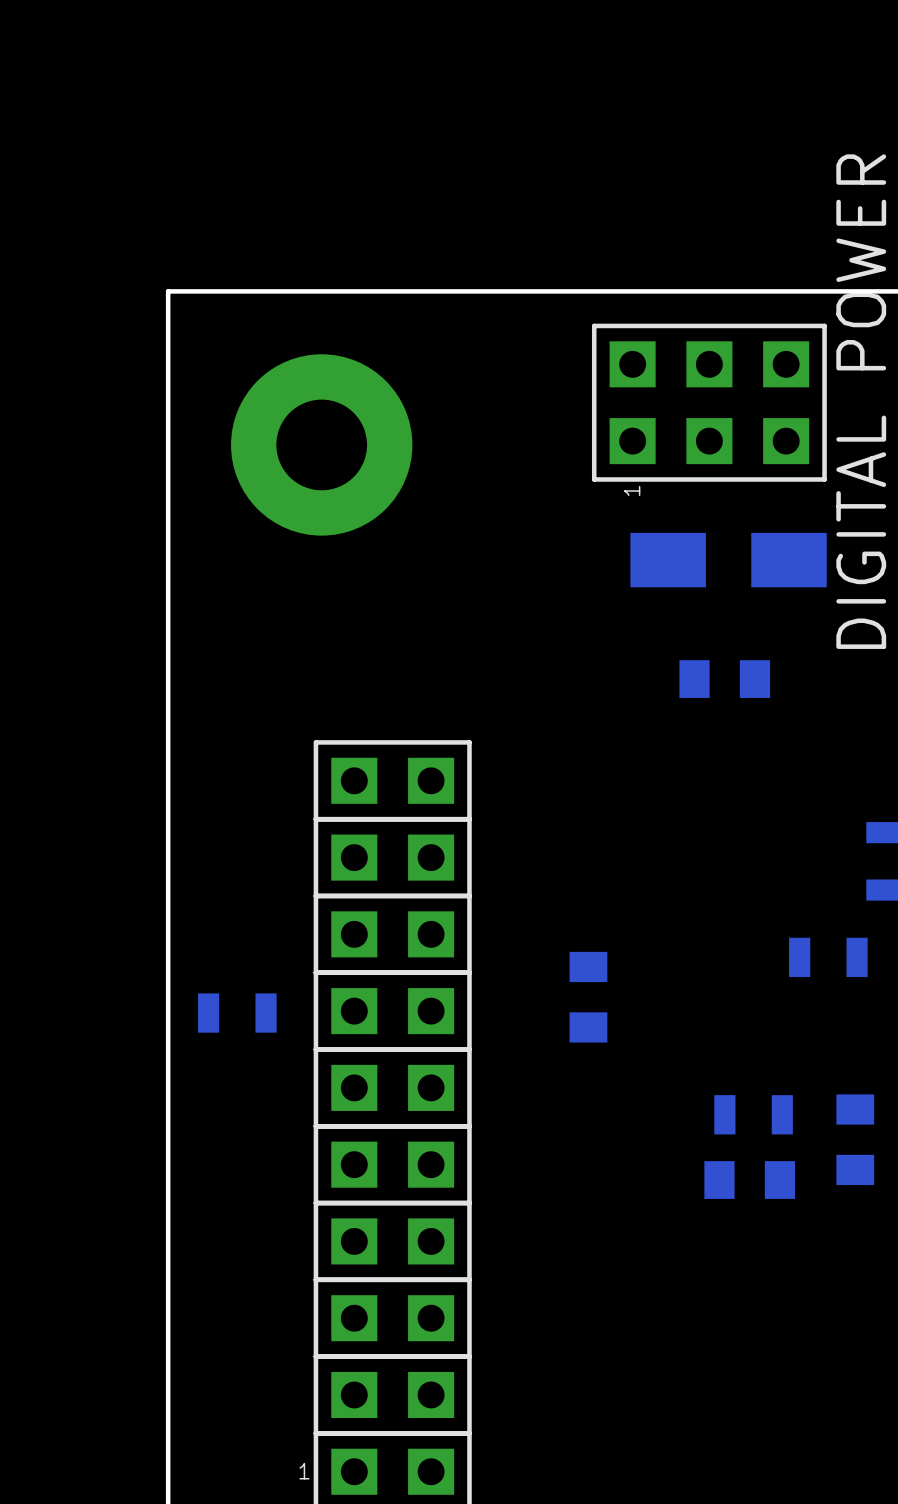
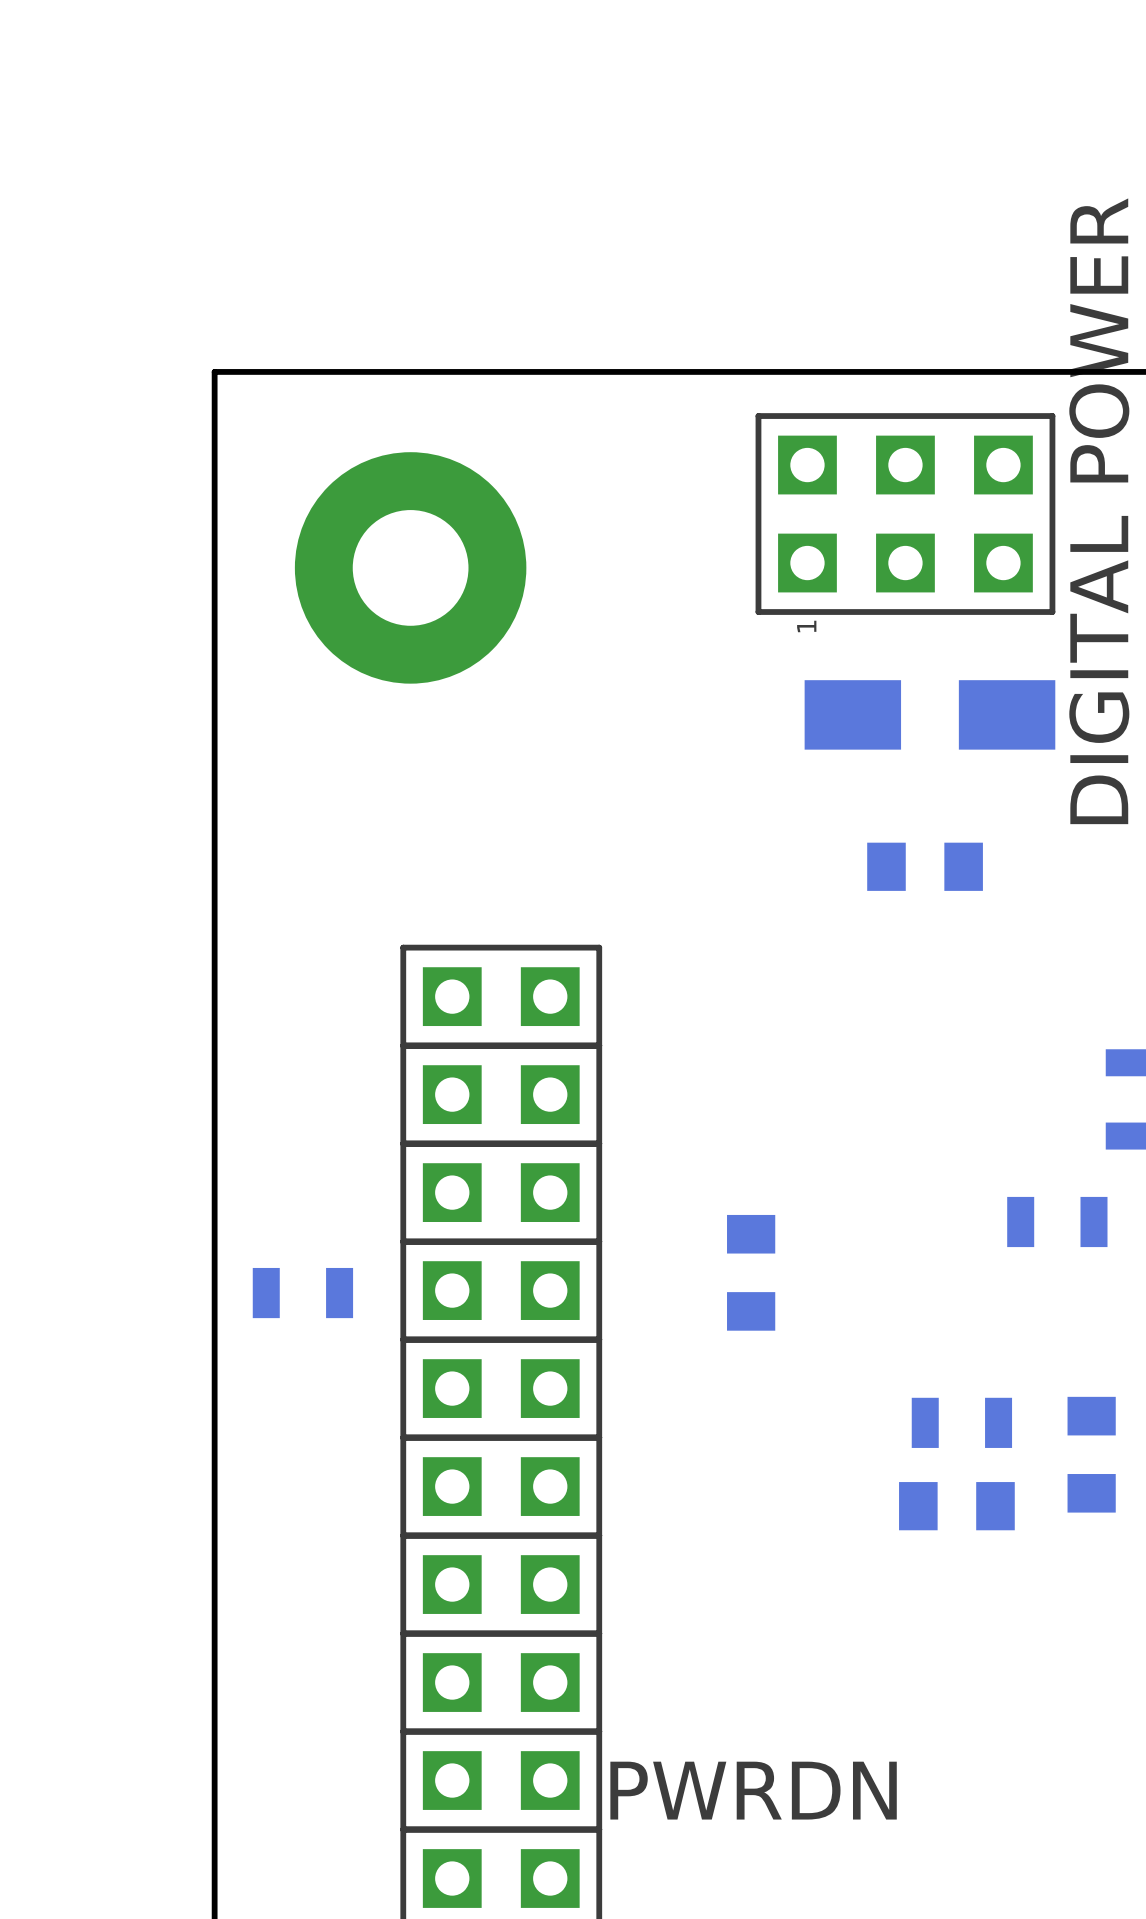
part value: none -> PWRDN (753, 1790)
part text: 1 (304, 1471) -> none

